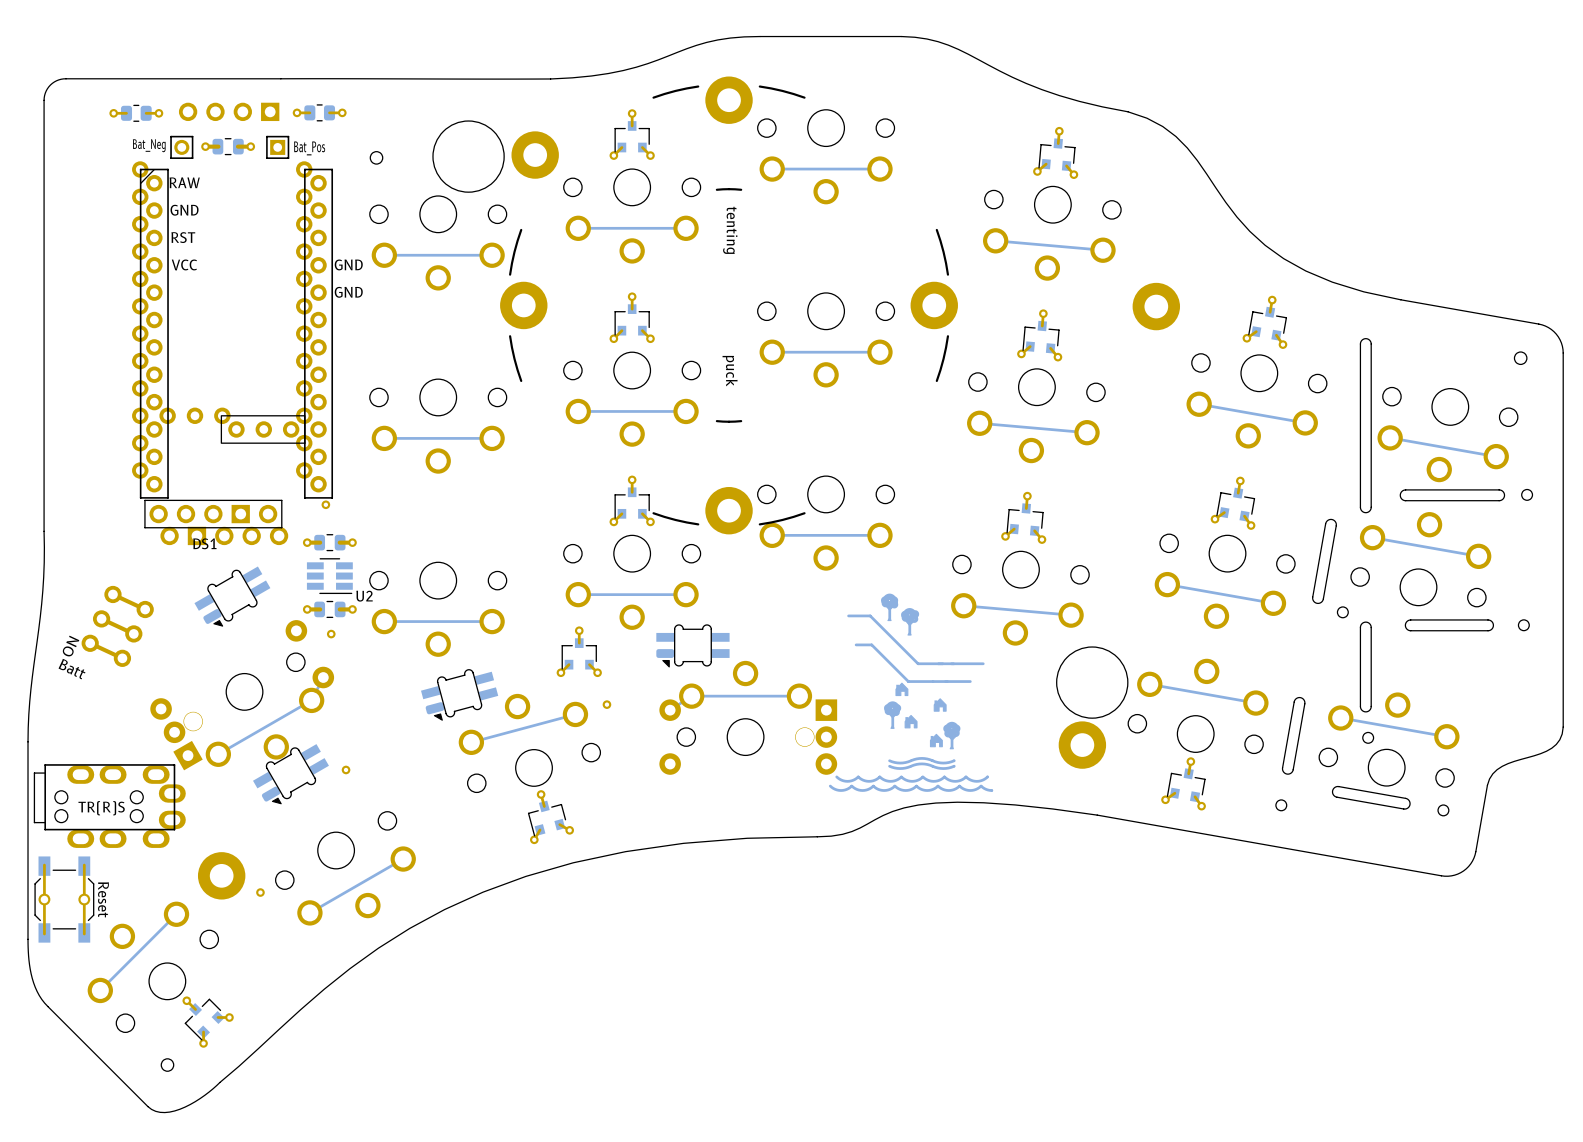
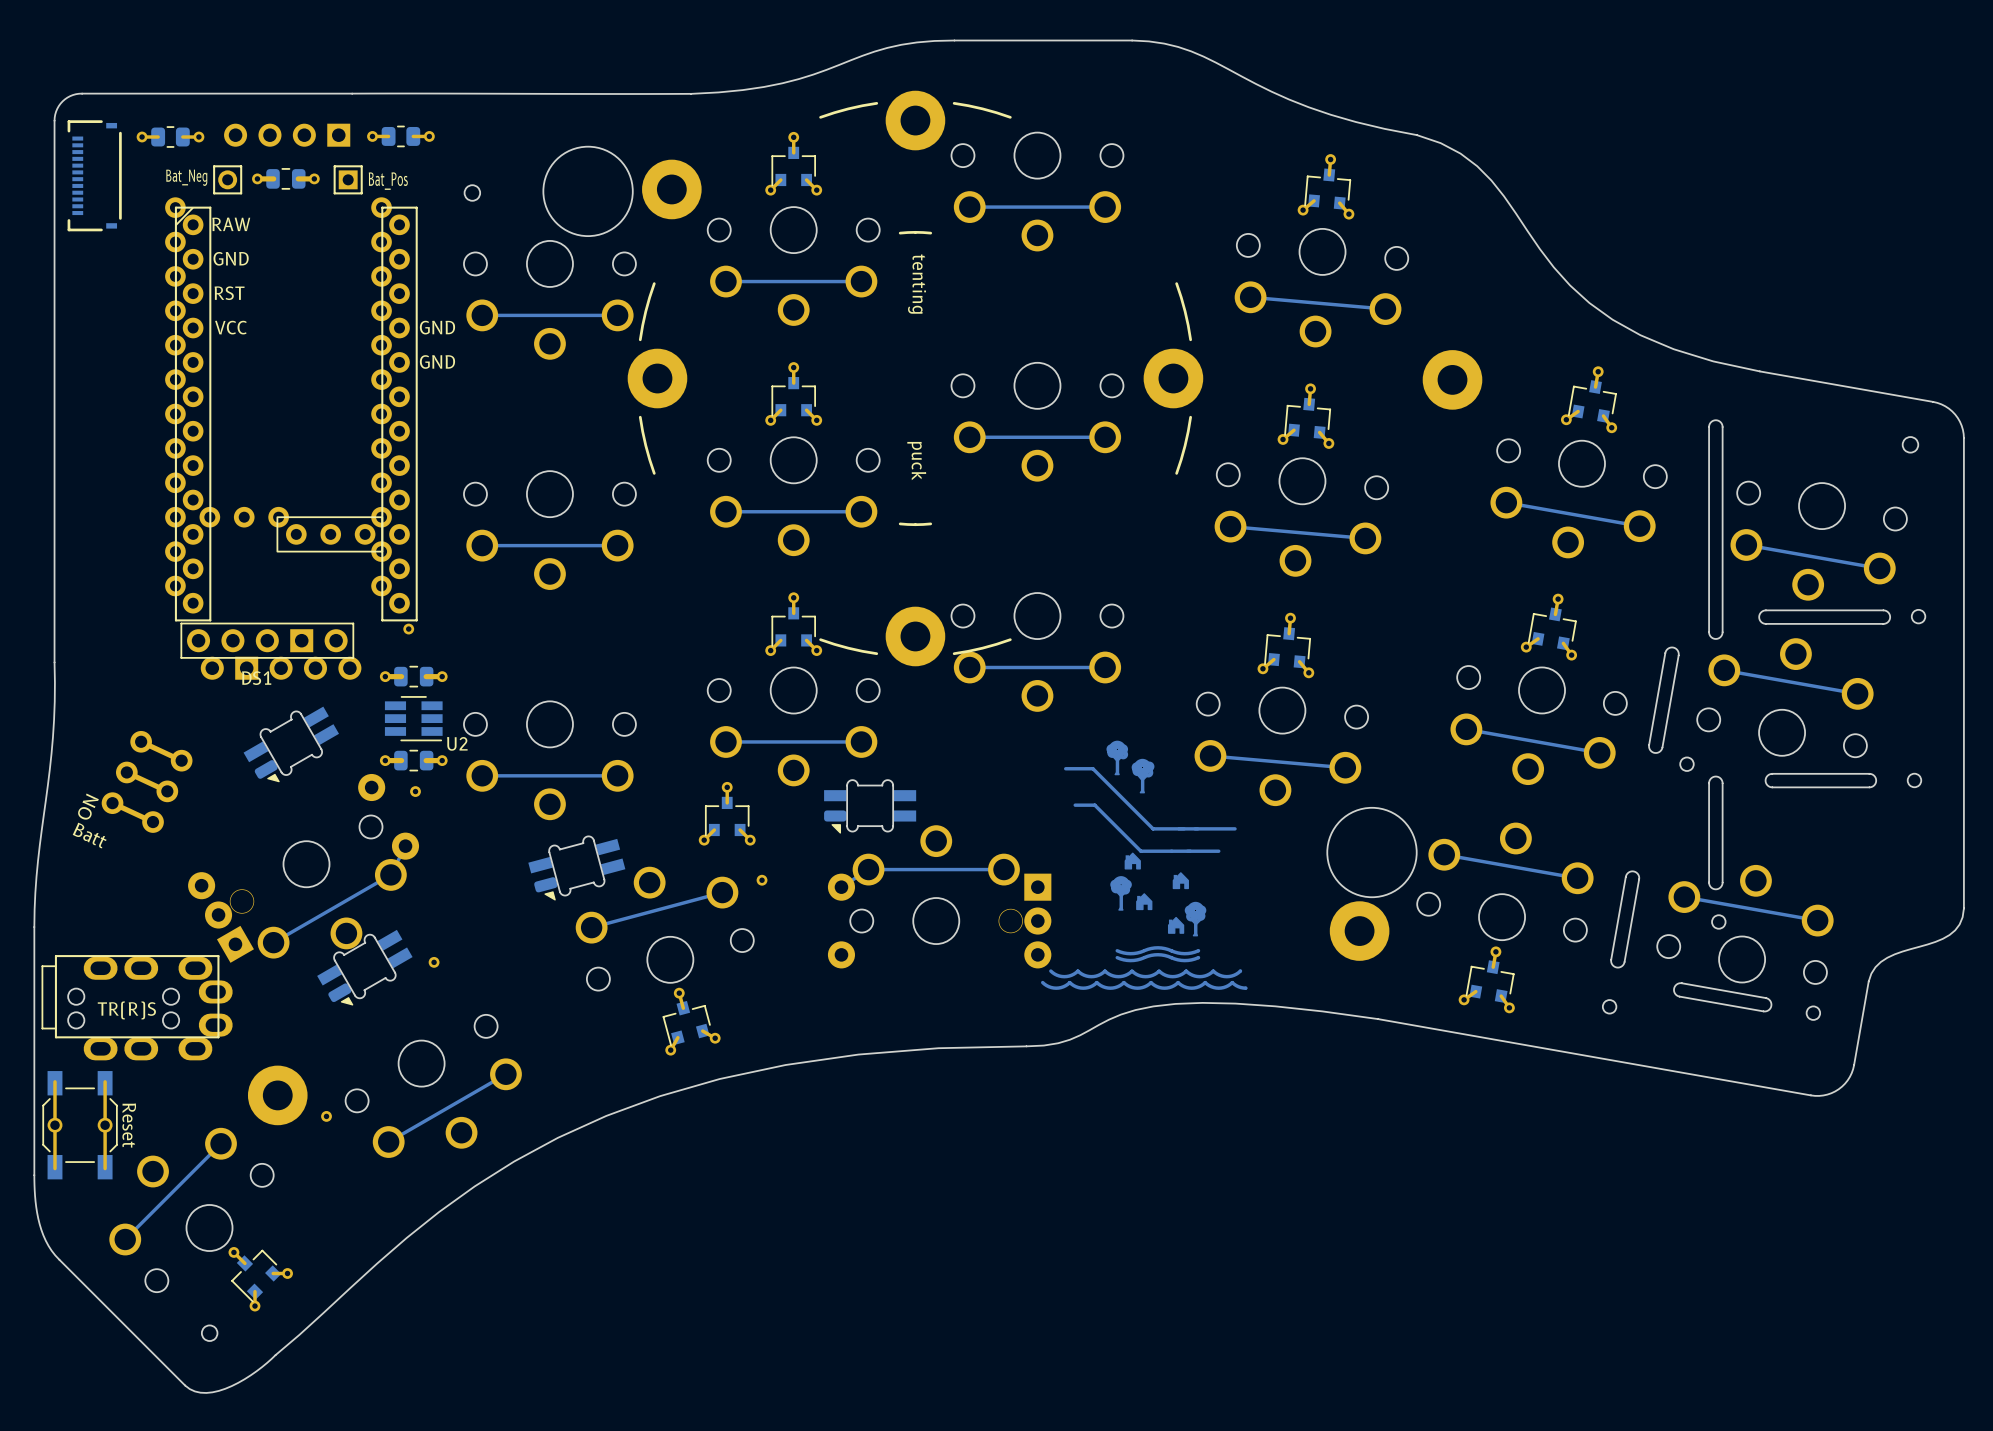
part: none -> (94, 175)

